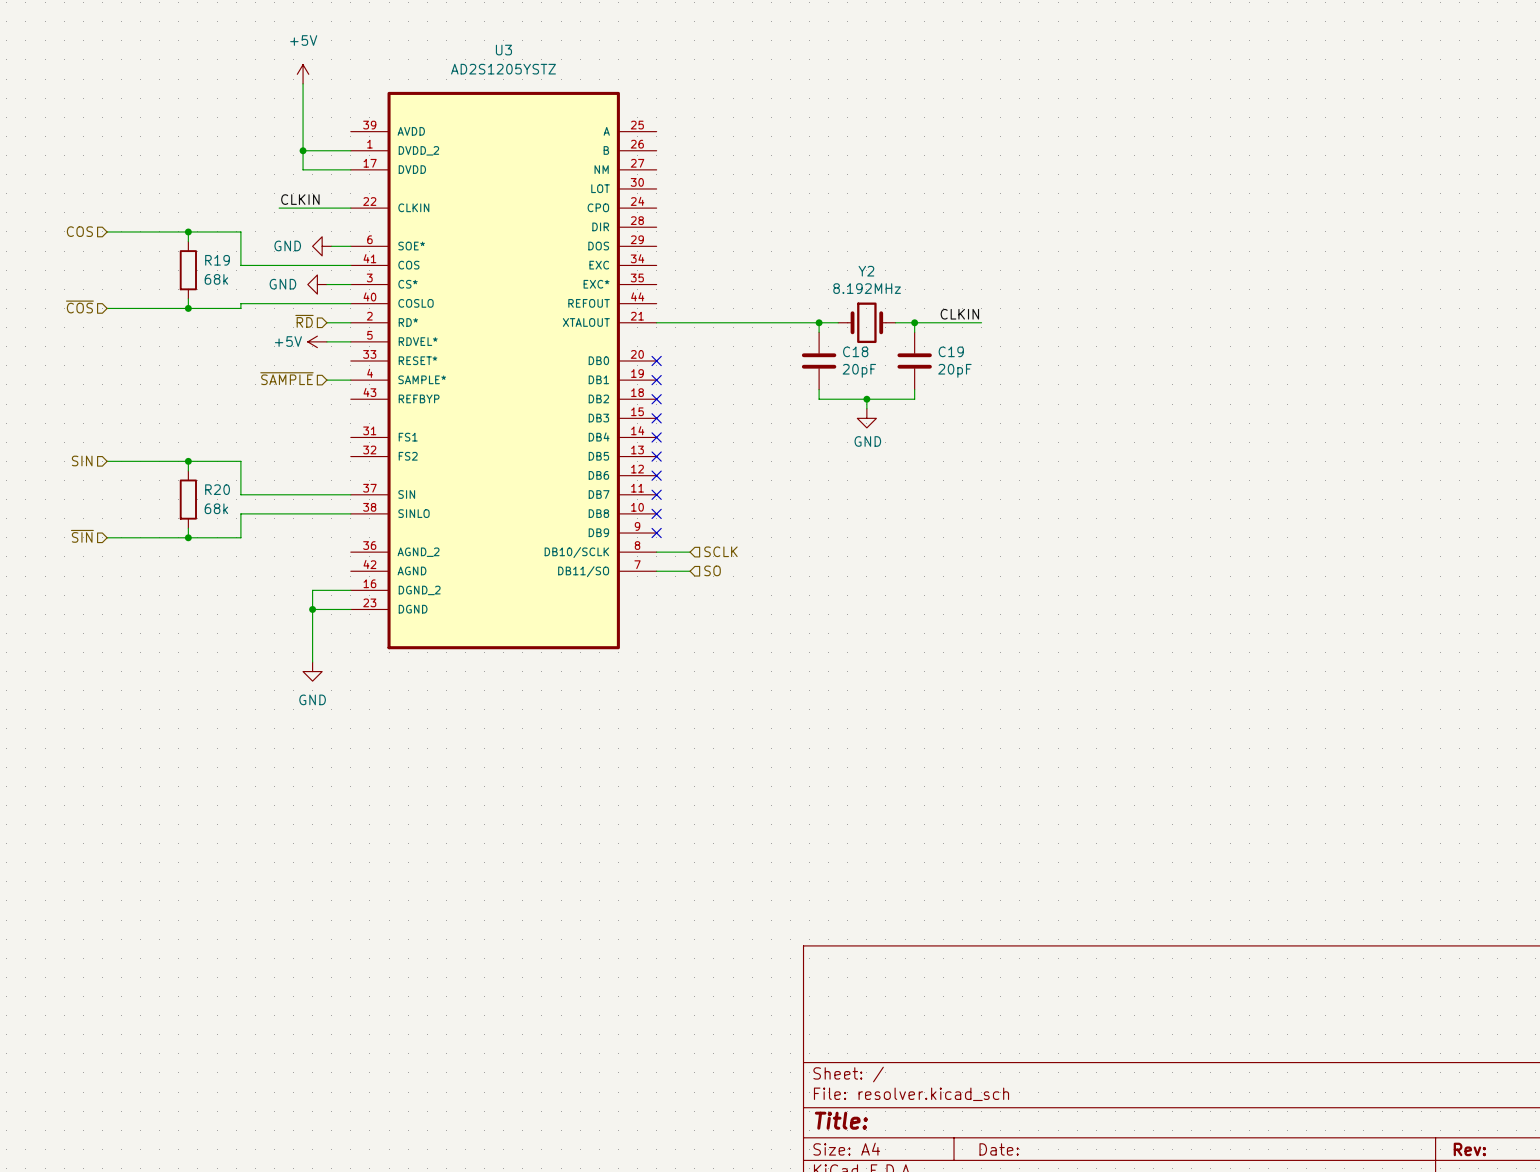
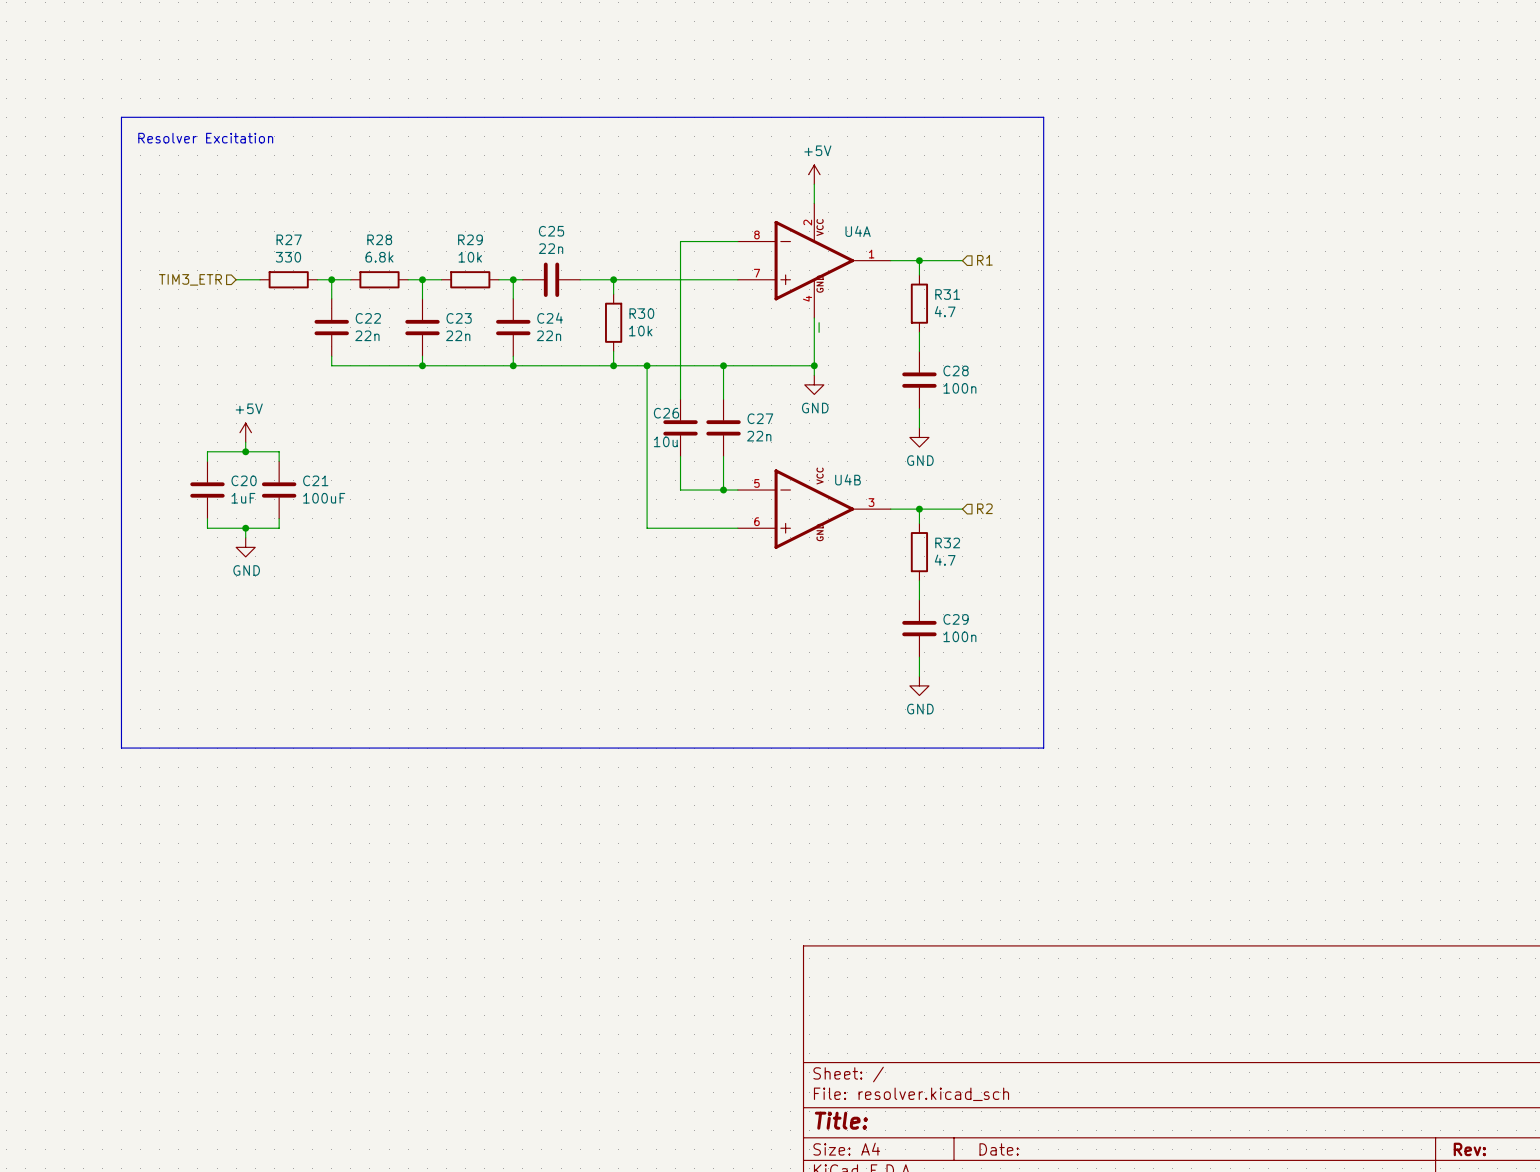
power symbol: +5V (303, 74) -> none
wire: (303, 83) (303, 169) (350, 169) -> none
line: none -> (121, 117) (121, 748) (1043, 748) (1043, 117) (121, 117)
text: none -> Resolver Excitation (205, 138)
wire: (303, 150) (350, 150) -> none
junction: (303, 150) -> none
power symbol: none -> +5V (814, 174)
wire: none -> (814, 184) (814, 203)
label: CLKIN (300, 199) -> none
wire: (279, 208) (350, 208) -> none
hierarchical label: COS (79, 231) -> none
wire: (107, 231) (240, 231) (240, 265) (350, 265) -> none
wire: (188, 231) (188, 241) -> none
junction: (188, 231) -> none
wire: none -> (737, 241) (680, 241) (680, 399)
power symbol: GND (322, 246) -> none
wire: (331, 246) (350, 246) -> none
U4A: none -> (814, 260)
wire: none -> (890, 260) (962, 260)
wire: none -> (919, 260) (919, 274)
junction: none -> (919, 260)
hierarchical label: none -> R1 (984, 260)
R19: 68k (188, 270) -> none
hierarchical label: none -> TIM3_ETR (190, 279)
R27: none -> 330 (288, 279)
wire: none -> (317, 279) (350, 279)
wire: none -> (331, 279) (331, 298)
junction: none -> (331, 279)
R28: none -> 6.8k (379, 279)
junction: none -> (422, 279)
R29: none -> 10k (470, 279)
junction: none -> (513, 279)
C25: none -> 22n (551, 279)
wire: none -> (580, 279) (737, 279)
junction: none -> (613, 279)
power symbol: GND (317, 284) -> none
wire: (326, 284) (350, 284) -> (236, 279) (260, 279)
wire: (188, 298) (188, 308) -> none
wire: (350, 303) (240, 303) (240, 308) (107, 308) -> none
R31: none -> 4.7 (919, 303)
hierarchical label: ~{COS} (79, 306) -> none
junction: (188, 308) -> none
label: CLKIN (959, 314) -> none
wire: none -> (814, 317) (814, 375)
hierarchical label: ~{RD} (304, 321) -> none
R30: none -> 10k (613, 322)
wire: (656, 322) (838, 322) -> none
junction: (819, 322) -> none
Y2: 8.192MHz (866, 322) -> none
wire: (895, 322) (981, 322) -> none
wire: (914, 322) (914, 332) -> none
junction: (914, 322) -> none
C22: none -> 22n (331, 327)
C23: none -> 22n (422, 327)
C24: none -> 22n (513, 327)
wire: none -> (919, 332) (919, 351)
power symbol rotation: 0° (317, 341) -> 90° clockwise (245, 432)
power symbol position: +5V (317, 341) -> +5V (245, 432)
wire: (326, 341) (350, 341) -> none
wire: none -> (331, 356) (331, 365) (814, 365)
no-connect mark: (656, 361) -> none
C18: 20pF (819, 361) -> none
C19: 20pF (914, 361) -> none
junction: none -> (422, 365)
junction: none -> (513, 365)
junction: none -> (613, 365)
wire: none -> (647, 365) (647, 528) (737, 528)
junction: none -> (647, 365)
wire: none -> (723, 365) (723, 399)
junction: none -> (723, 365)
junction: none -> (814, 365)
U3: AD2S1205YSTZ (503, 370) -> none
hierarchical label: ~{SAMPLE} (286, 378) -> none
wire: (326, 380) (350, 380) -> none
no-connect mark: (656, 380) -> none
C28: none -> 100n (919, 380)
power symbol: none -> GND (814, 384)
wire: (819, 389) (819, 399) (914, 399) (914, 389) -> none
no-connect mark: (656, 399) -> none
wire: (866, 399) (866, 408) -> none
junction: (866, 399) -> none
wire: none -> (919, 408) (919, 427)
no-connect mark: (656, 418) -> none
power symbol: GND (866, 418) -> none
C26: none -> 10u (680, 427)
C27: none -> 22n (723, 427)
no-connect mark: (656, 437) -> none
power symbol: none -> GND (919, 437)
junction: none -> (245, 451)
no-connect mark: (656, 456) -> none
wire: none -> (680, 456) (680, 490) (737, 490)
wire: none -> (723, 456) (723, 490)
hierarchical label: SIN (82, 460) -> none
wire: (107, 461) (240, 461) (240, 494) (350, 494) -> none
wire: (188, 461) (188, 470) -> (245, 442) (245, 451)
junction: (188, 461) -> none
wire: none -> (207, 461) (207, 451) (279, 451) (279, 461)
no-connect mark: (656, 475) -> none
C20: none -> 1uF (207, 490)
C21: none -> 100uF (279, 490)
junction: none -> (723, 490)
no-connect mark: (656, 494) -> none
R20: 68k (188, 499) -> none
hierarchical label: none -> R2 (984, 508)
U4B: none -> (814, 509)
wire: none -> (890, 509) (962, 509)
wire: none -> (919, 509) (919, 523)
junction: none -> (919, 509)
wire: (350, 513) (240, 513) (240, 537) (107, 537) -> none
no-connect mark: (656, 513) -> none
wire: none -> (207, 518) (207, 528) (279, 528) (279, 518)
wire: (188, 528) (188, 537) -> (245, 528) (245, 537)
junction: none -> (245, 528)
no-connect mark: (656, 533) -> none
hierarchical label: ~{SIN} (82, 536) -> none
junction: (188, 537) -> none
power symbol: none -> GND (245, 547)
hierarchical label: SCLK (720, 551) -> none
wire: (656, 552) (690, 552) -> none
R32: none -> 4.7 (919, 552)
hierarchical label: SO (712, 570) -> none
wire: (656, 571) (690, 571) -> none
wire: none -> (919, 580) (919, 599)
wire: (350, 590) (312, 590) (312, 662) -> none
wire: (312, 609) (350, 609) -> none
junction: (312, 609) -> none
C29: none -> 100n (919, 628)
wire: none -> (919, 657) (919, 676)
power symbol: GND (312, 671) -> none
power symbol: none -> GND (919, 685)

